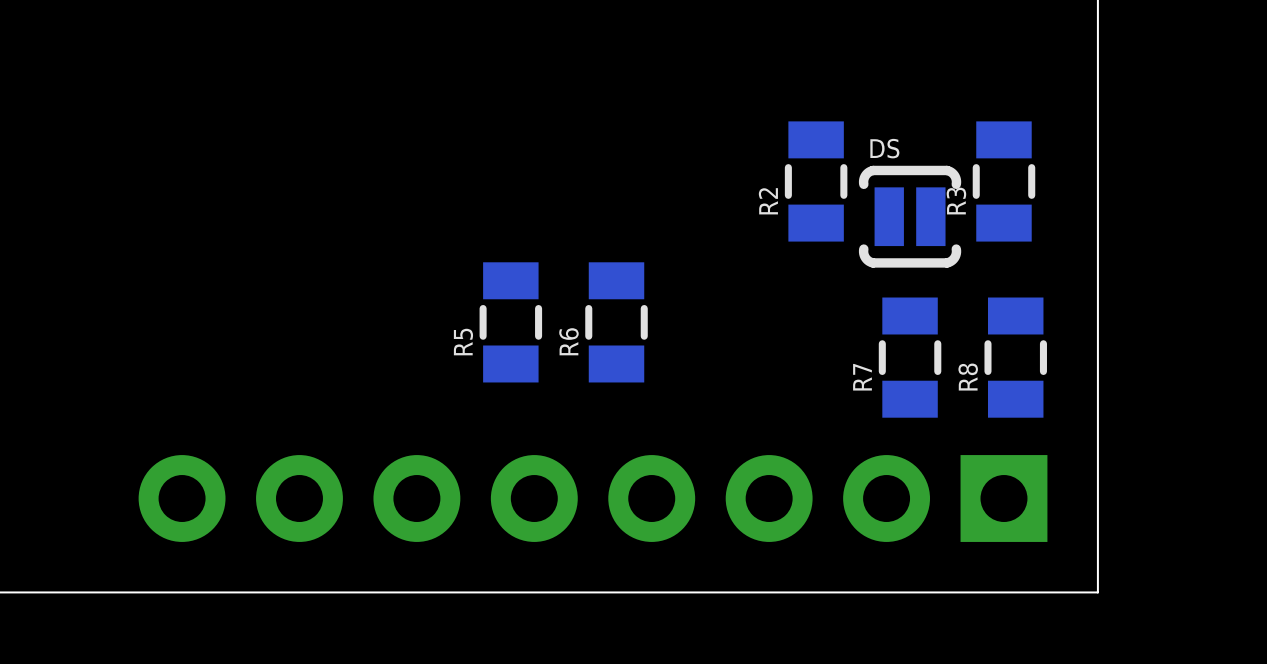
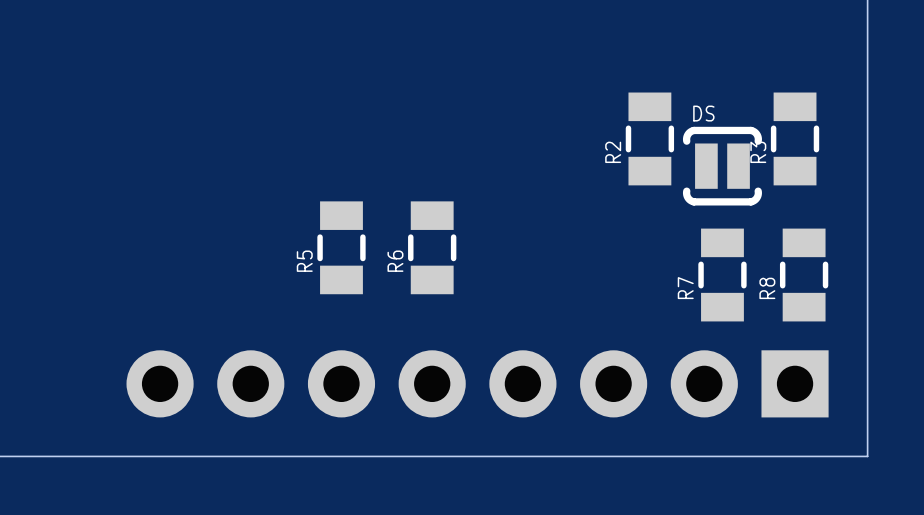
R5 position: (510, 322) -> (341, 247)
R6 position: (616, 322) -> (432, 247)

